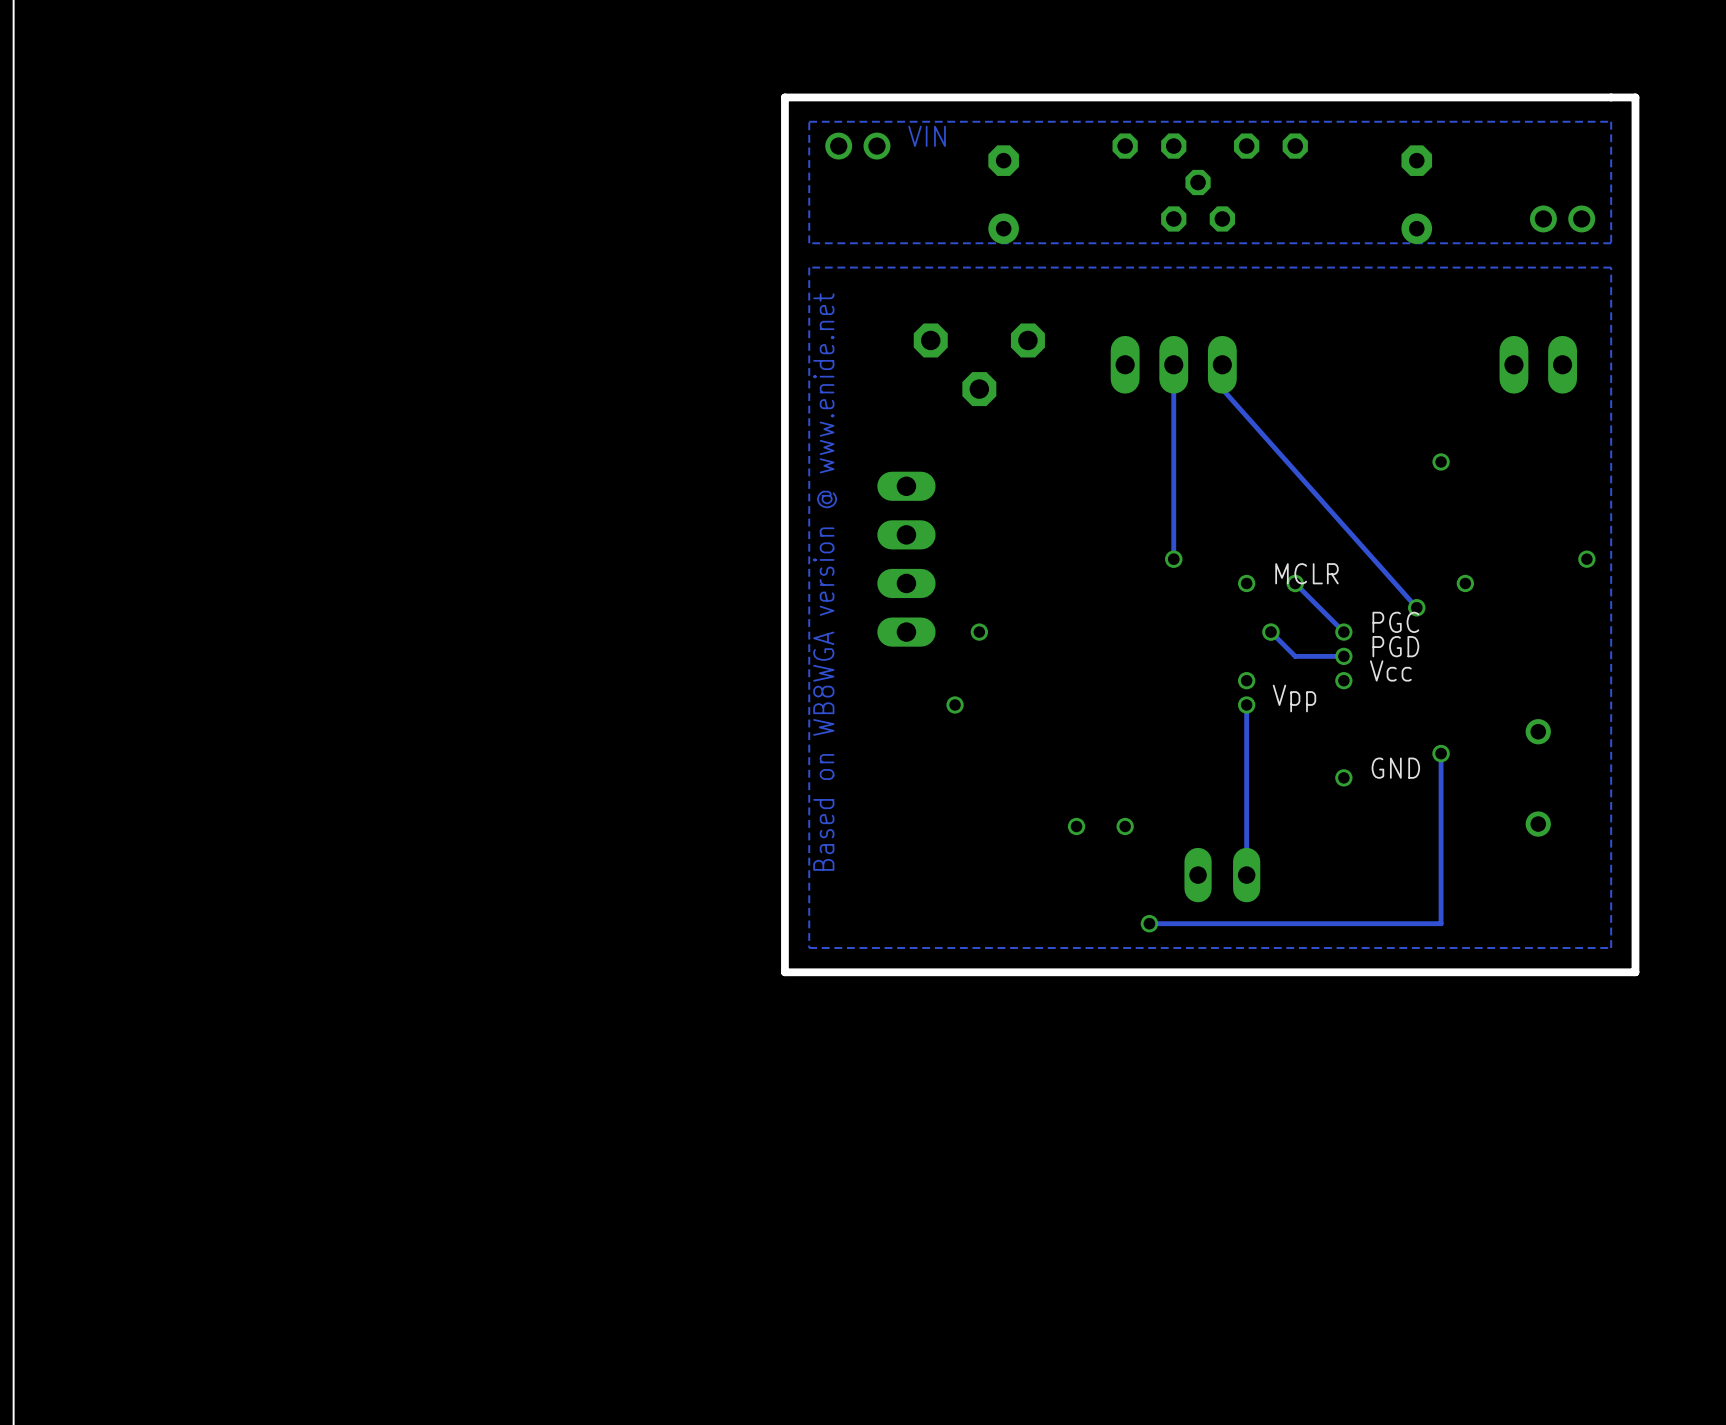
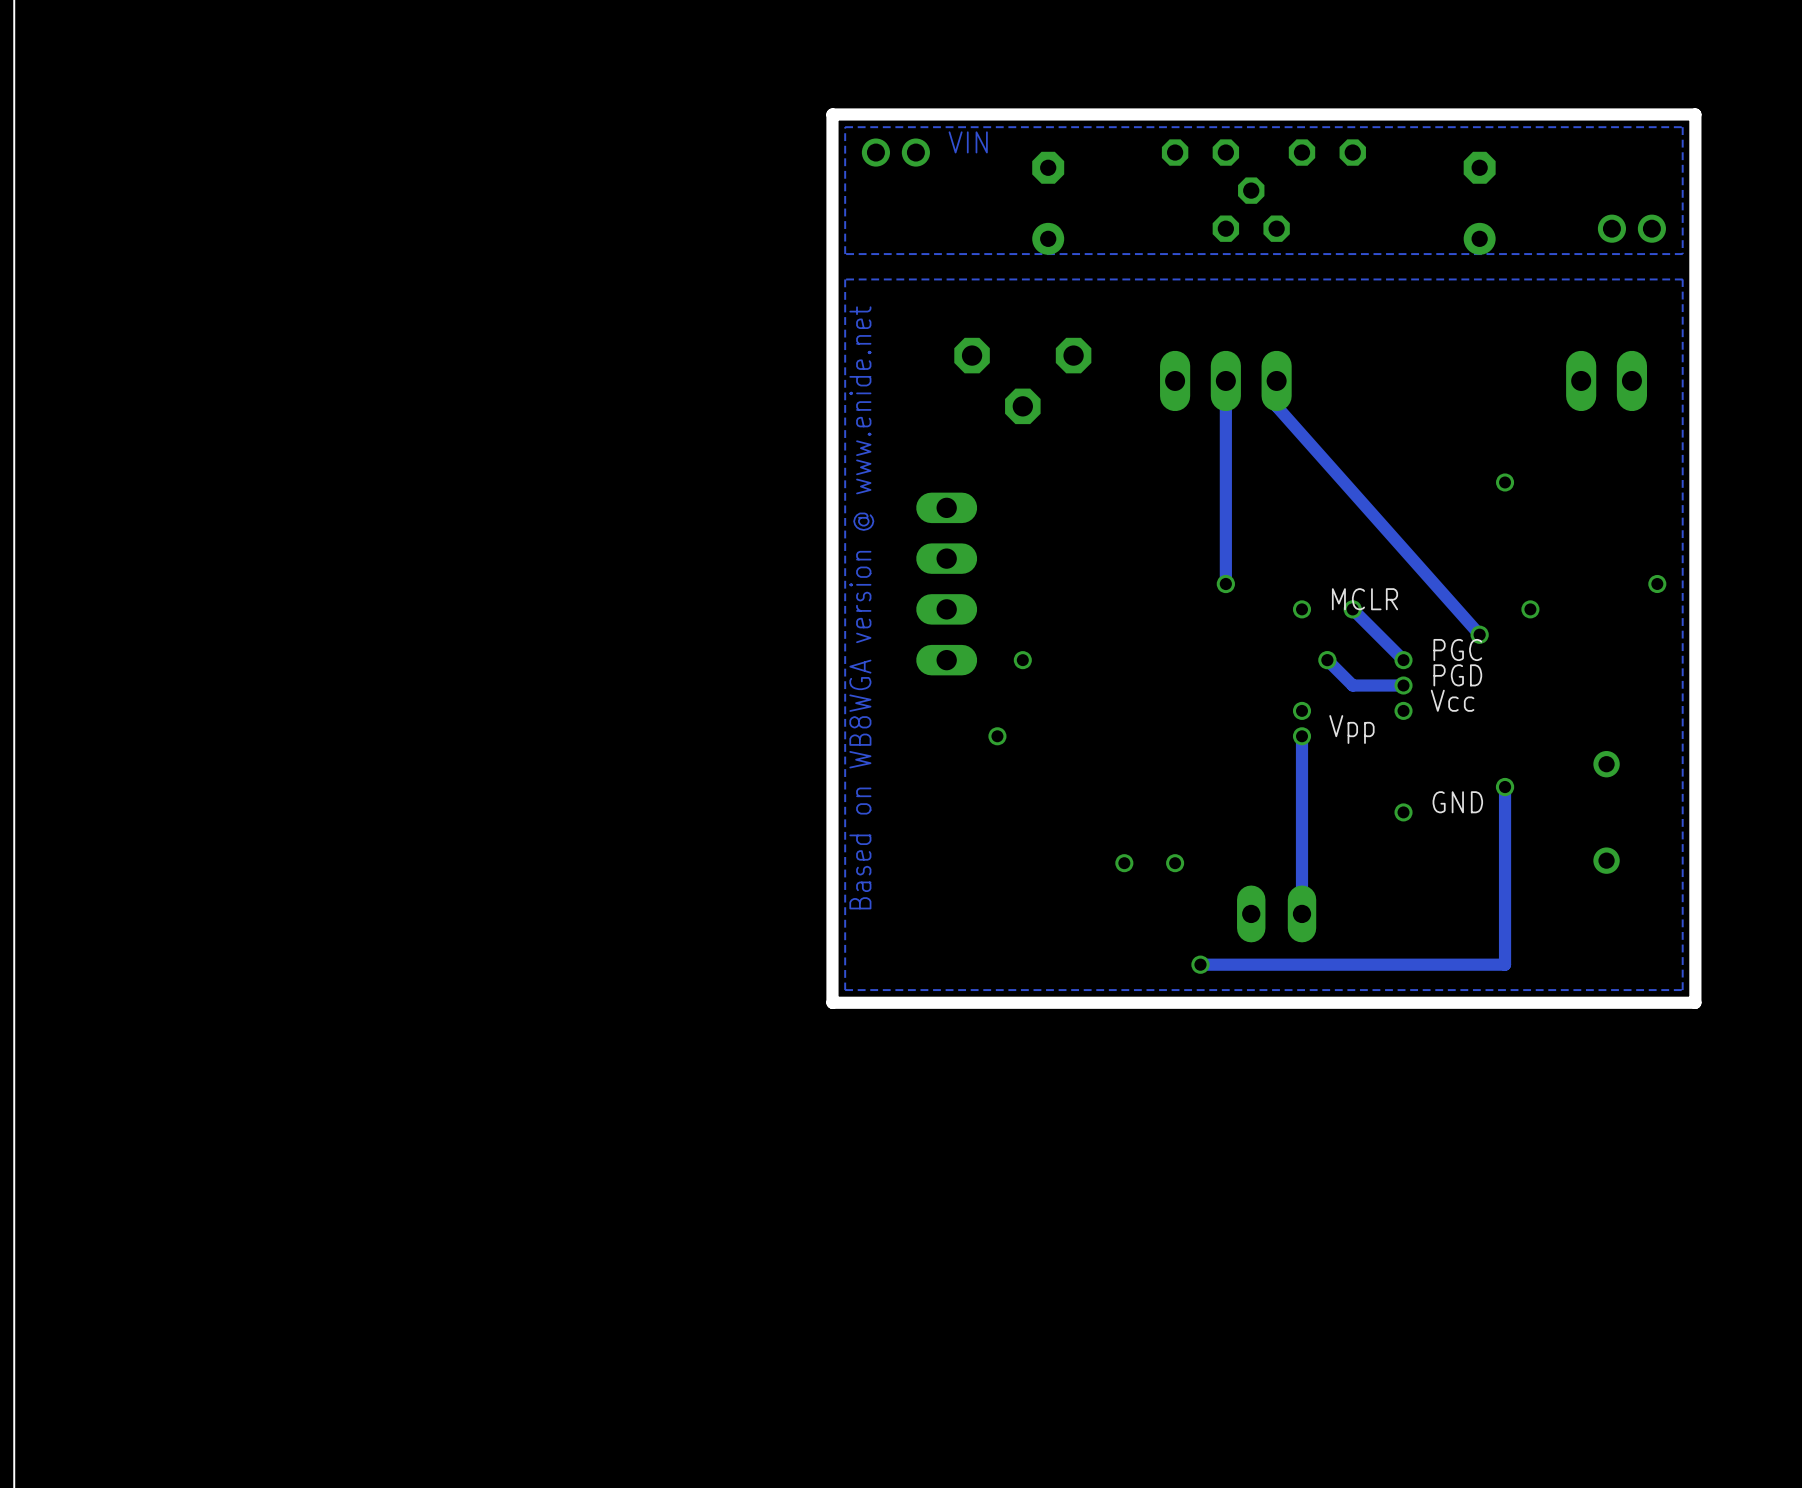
board edge: (1635, 97) (784, 97) (784, 972) (1635, 972) (1635, 97) -> (1695, 114) (1695, 1002) (832, 1002) (832, 114) (1695, 114)
track width: thin (1173, 364) (1173, 559) -> thick (1225, 380) (1225, 584)
track width: thin (1222, 364) (1222, 389) (1416, 607) -> thick (1276, 380) (1276, 406) (1479, 634)
track width: thin (1295, 583) (1343, 632) -> thick (1352, 609) (1403, 660)
track width: thin (1270, 632) (1295, 656) (1343, 656) -> thick (1327, 660) (1352, 685) (1403, 685)
track width: thin (1246, 704) (1246, 875) -> thick (1302, 736) (1302, 913)
track width: thin (1441, 753) (1441, 923) (1149, 923) -> thick (1505, 787) (1505, 964) (1200, 964)

